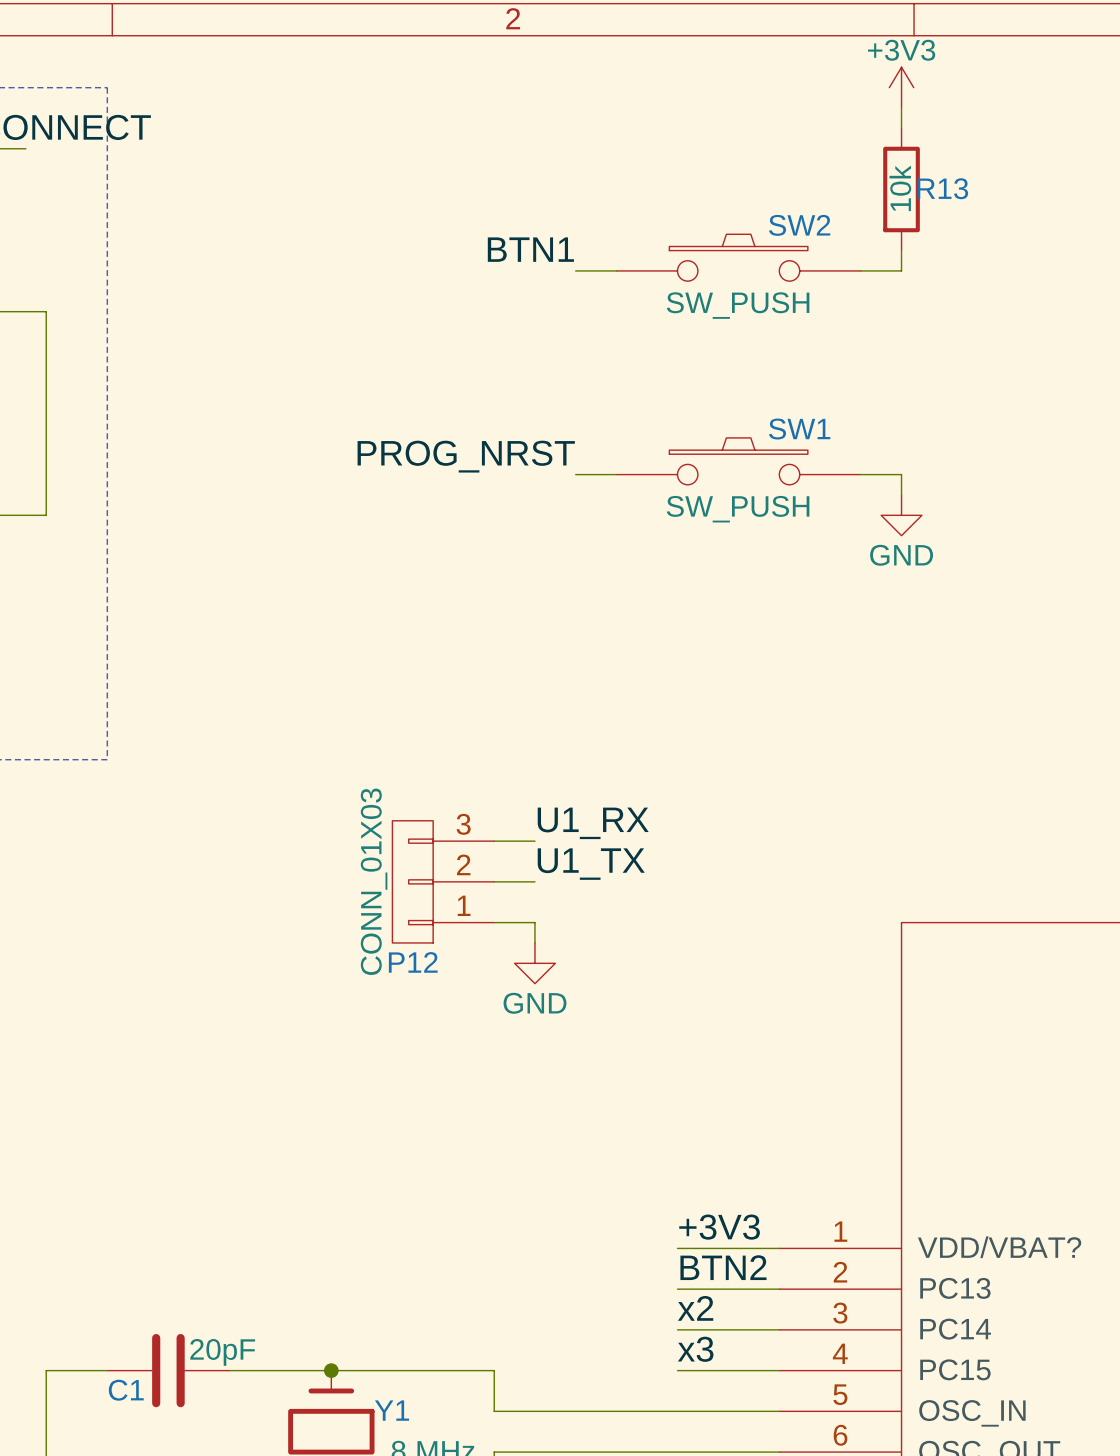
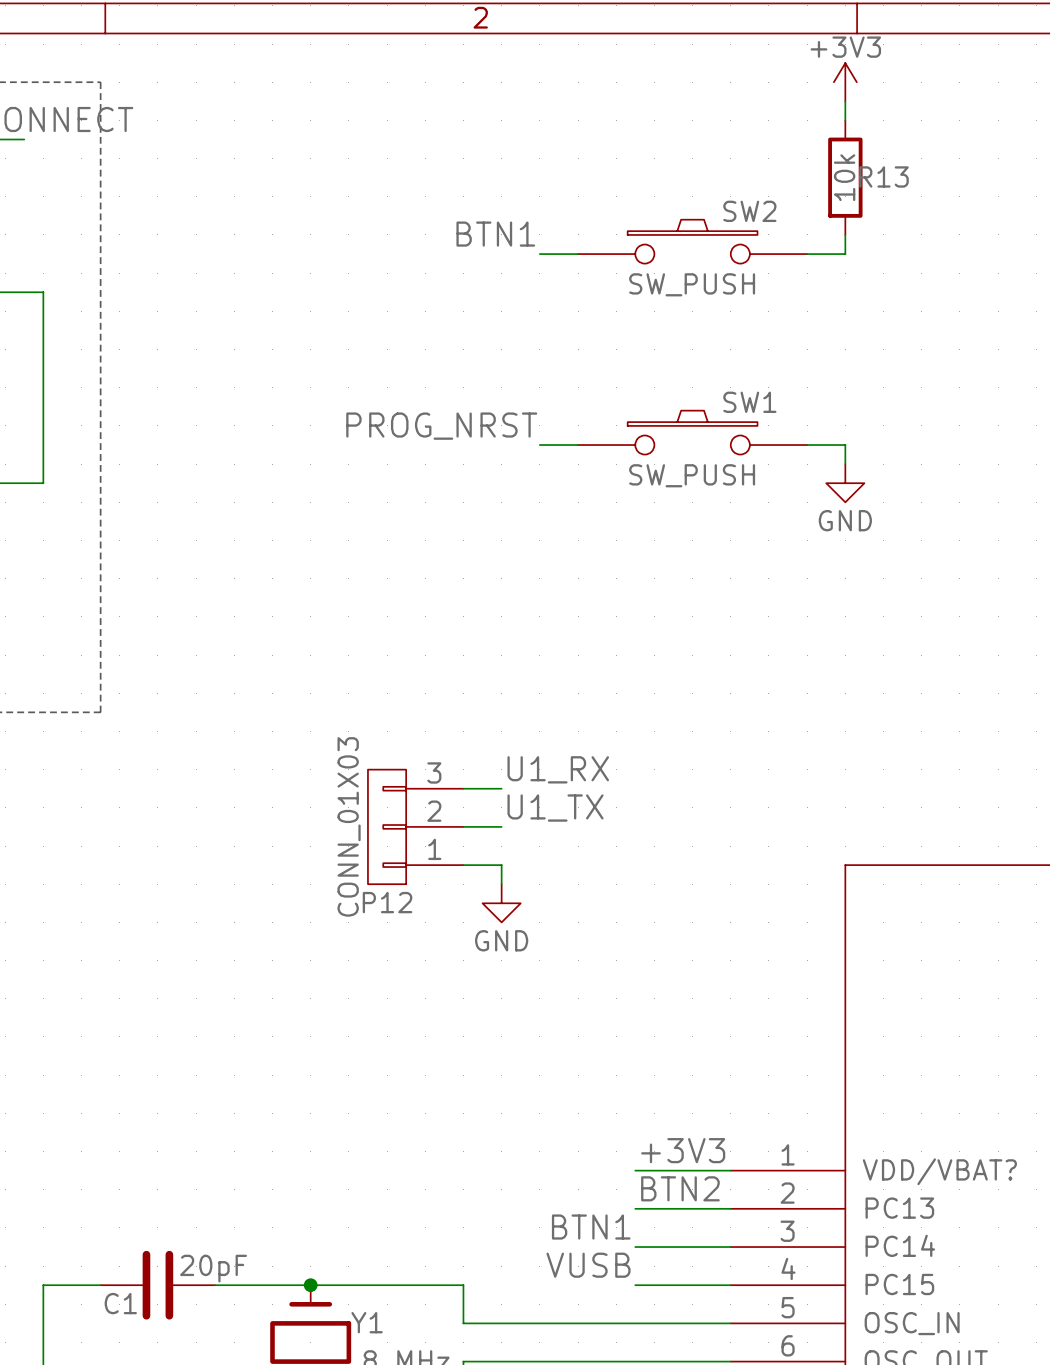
label: x2 (695, 1308) -> BTN1 (591, 1227)
label: x3 (695, 1349) -> VUSB (588, 1265)

